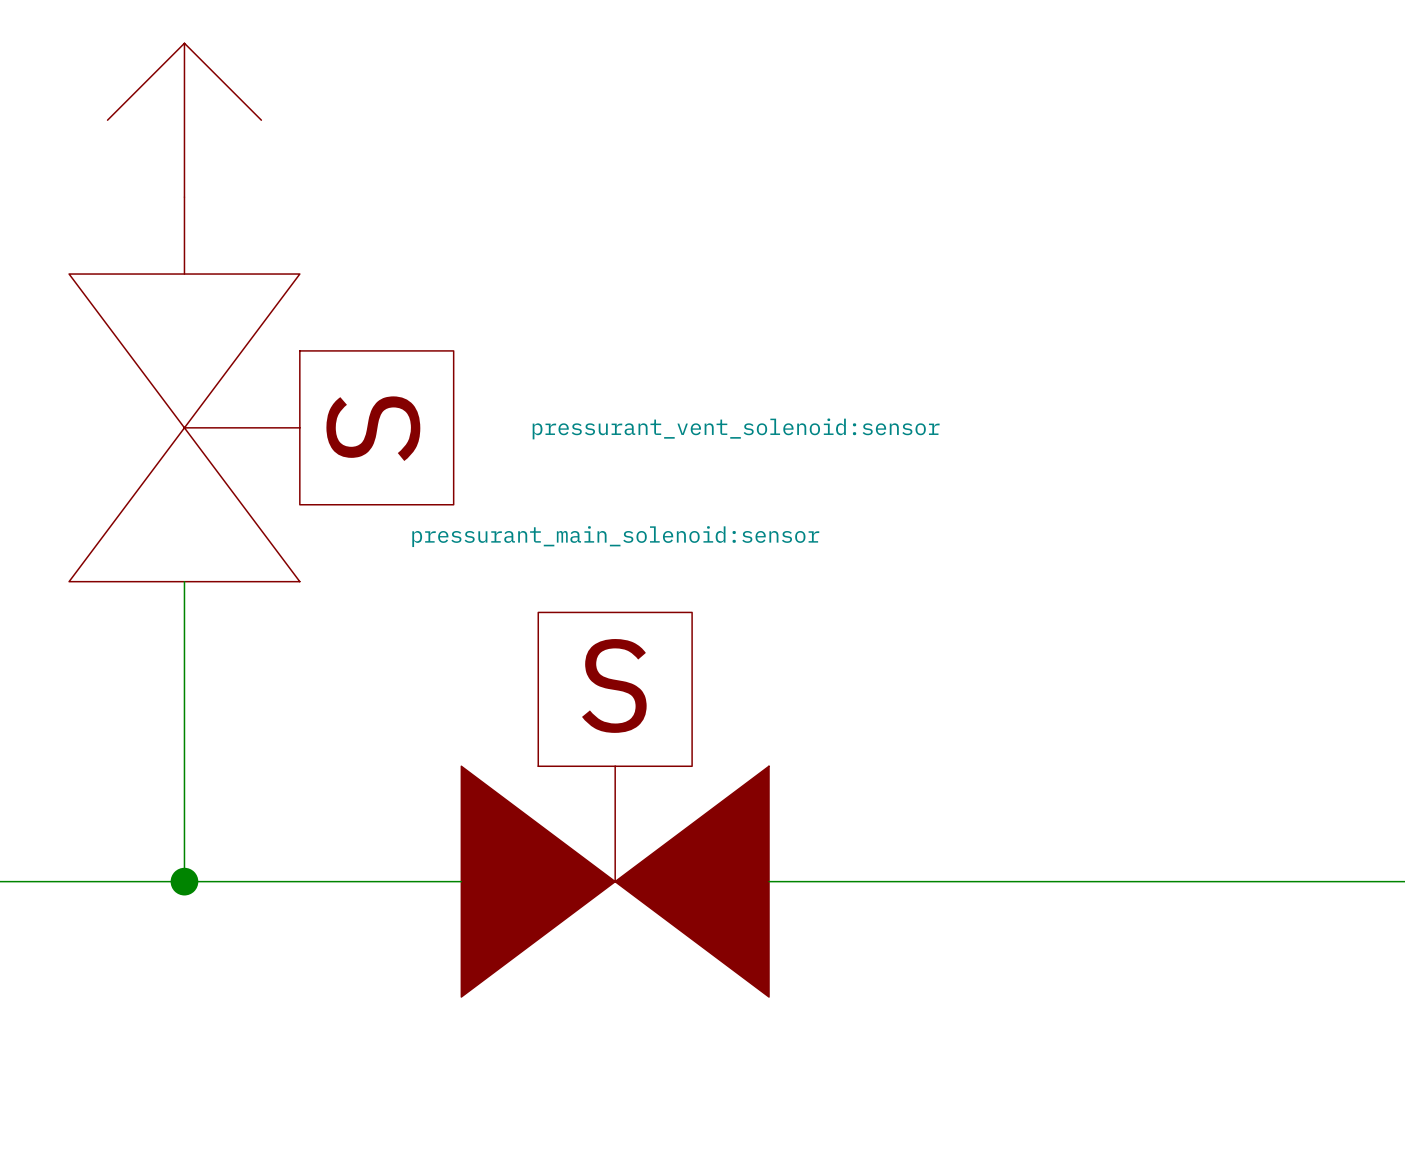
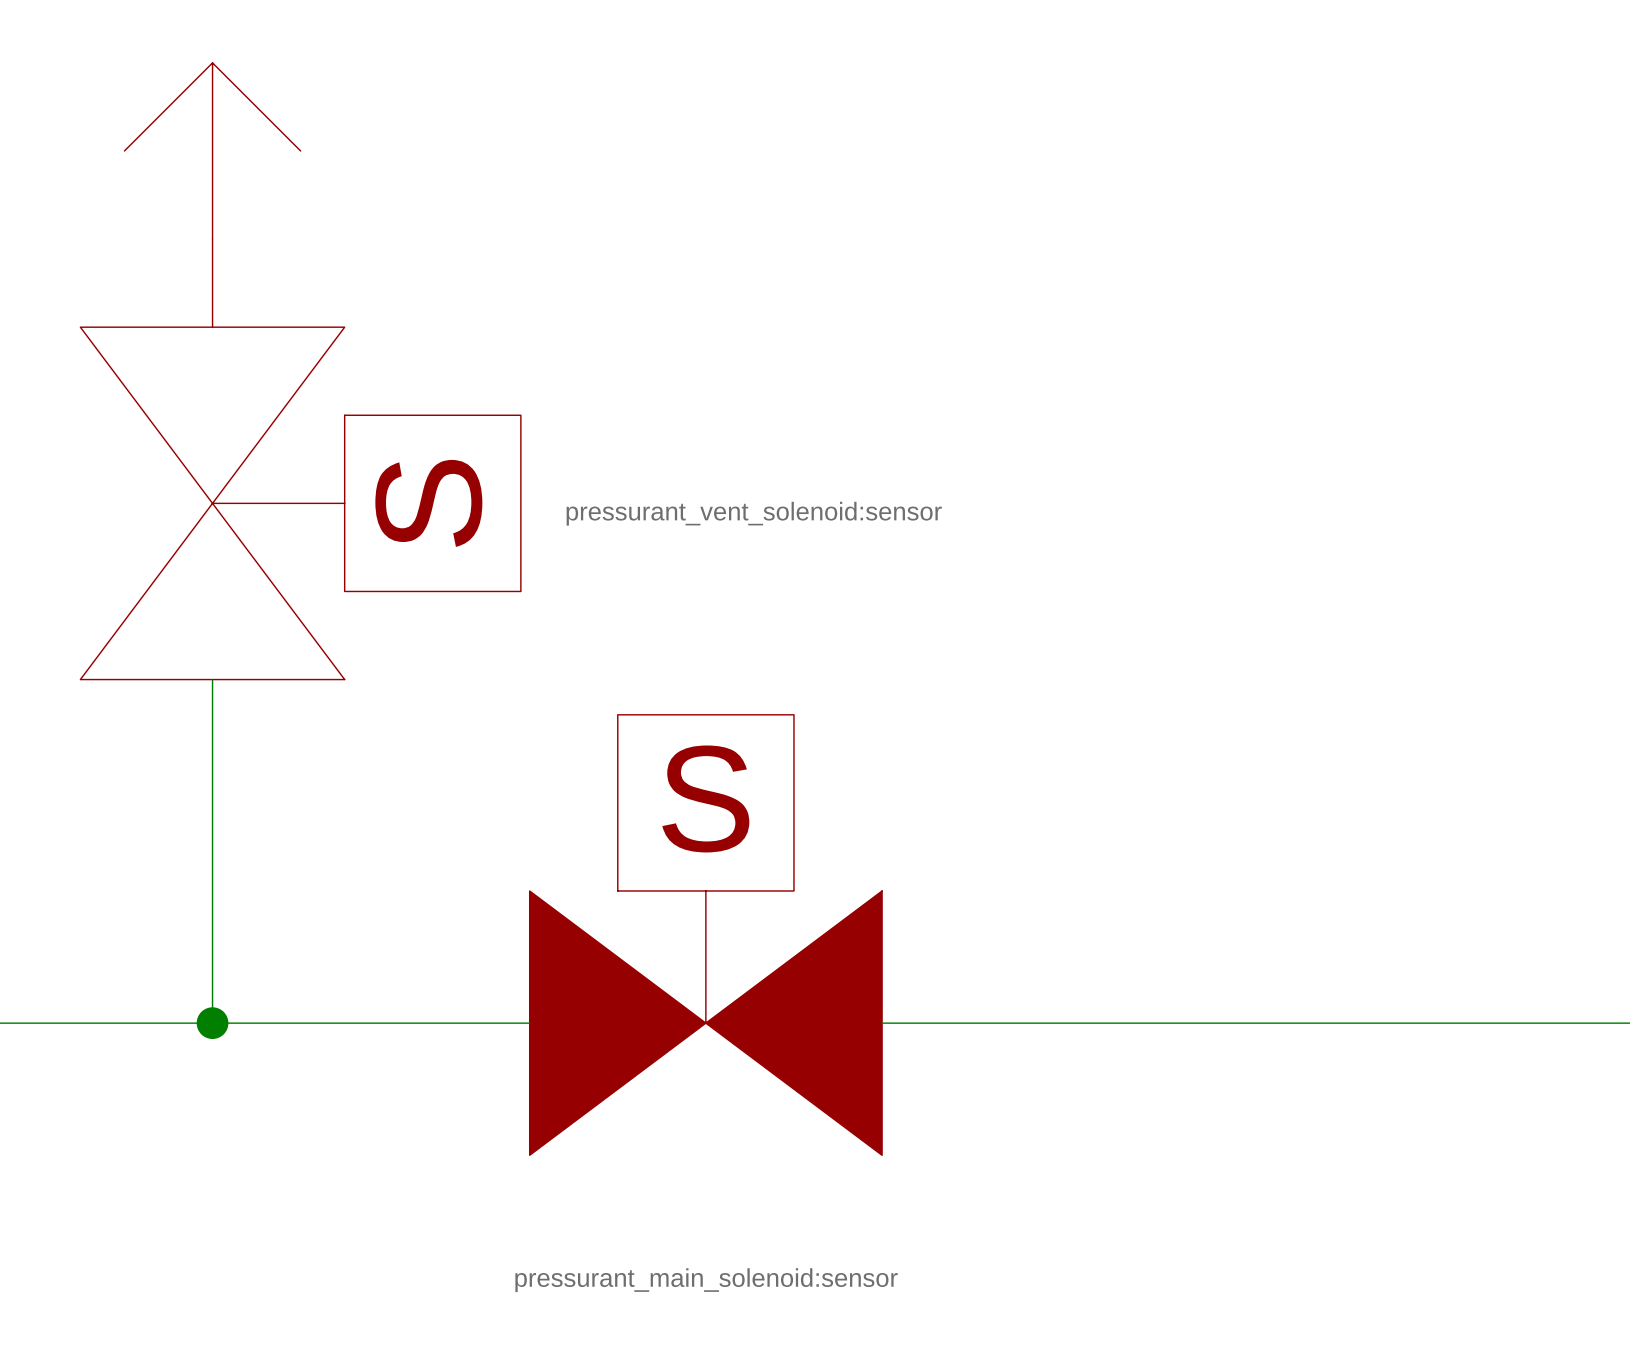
part value position: pressurant_vent_solenoid:sensor (736, 428) -> pressurant_vent_solenoid:sensor (754, 513)
part value position: pressurant_main_solenoid:sensor (615, 536) -> pressurant_main_solenoid:sensor (706, 1280)

